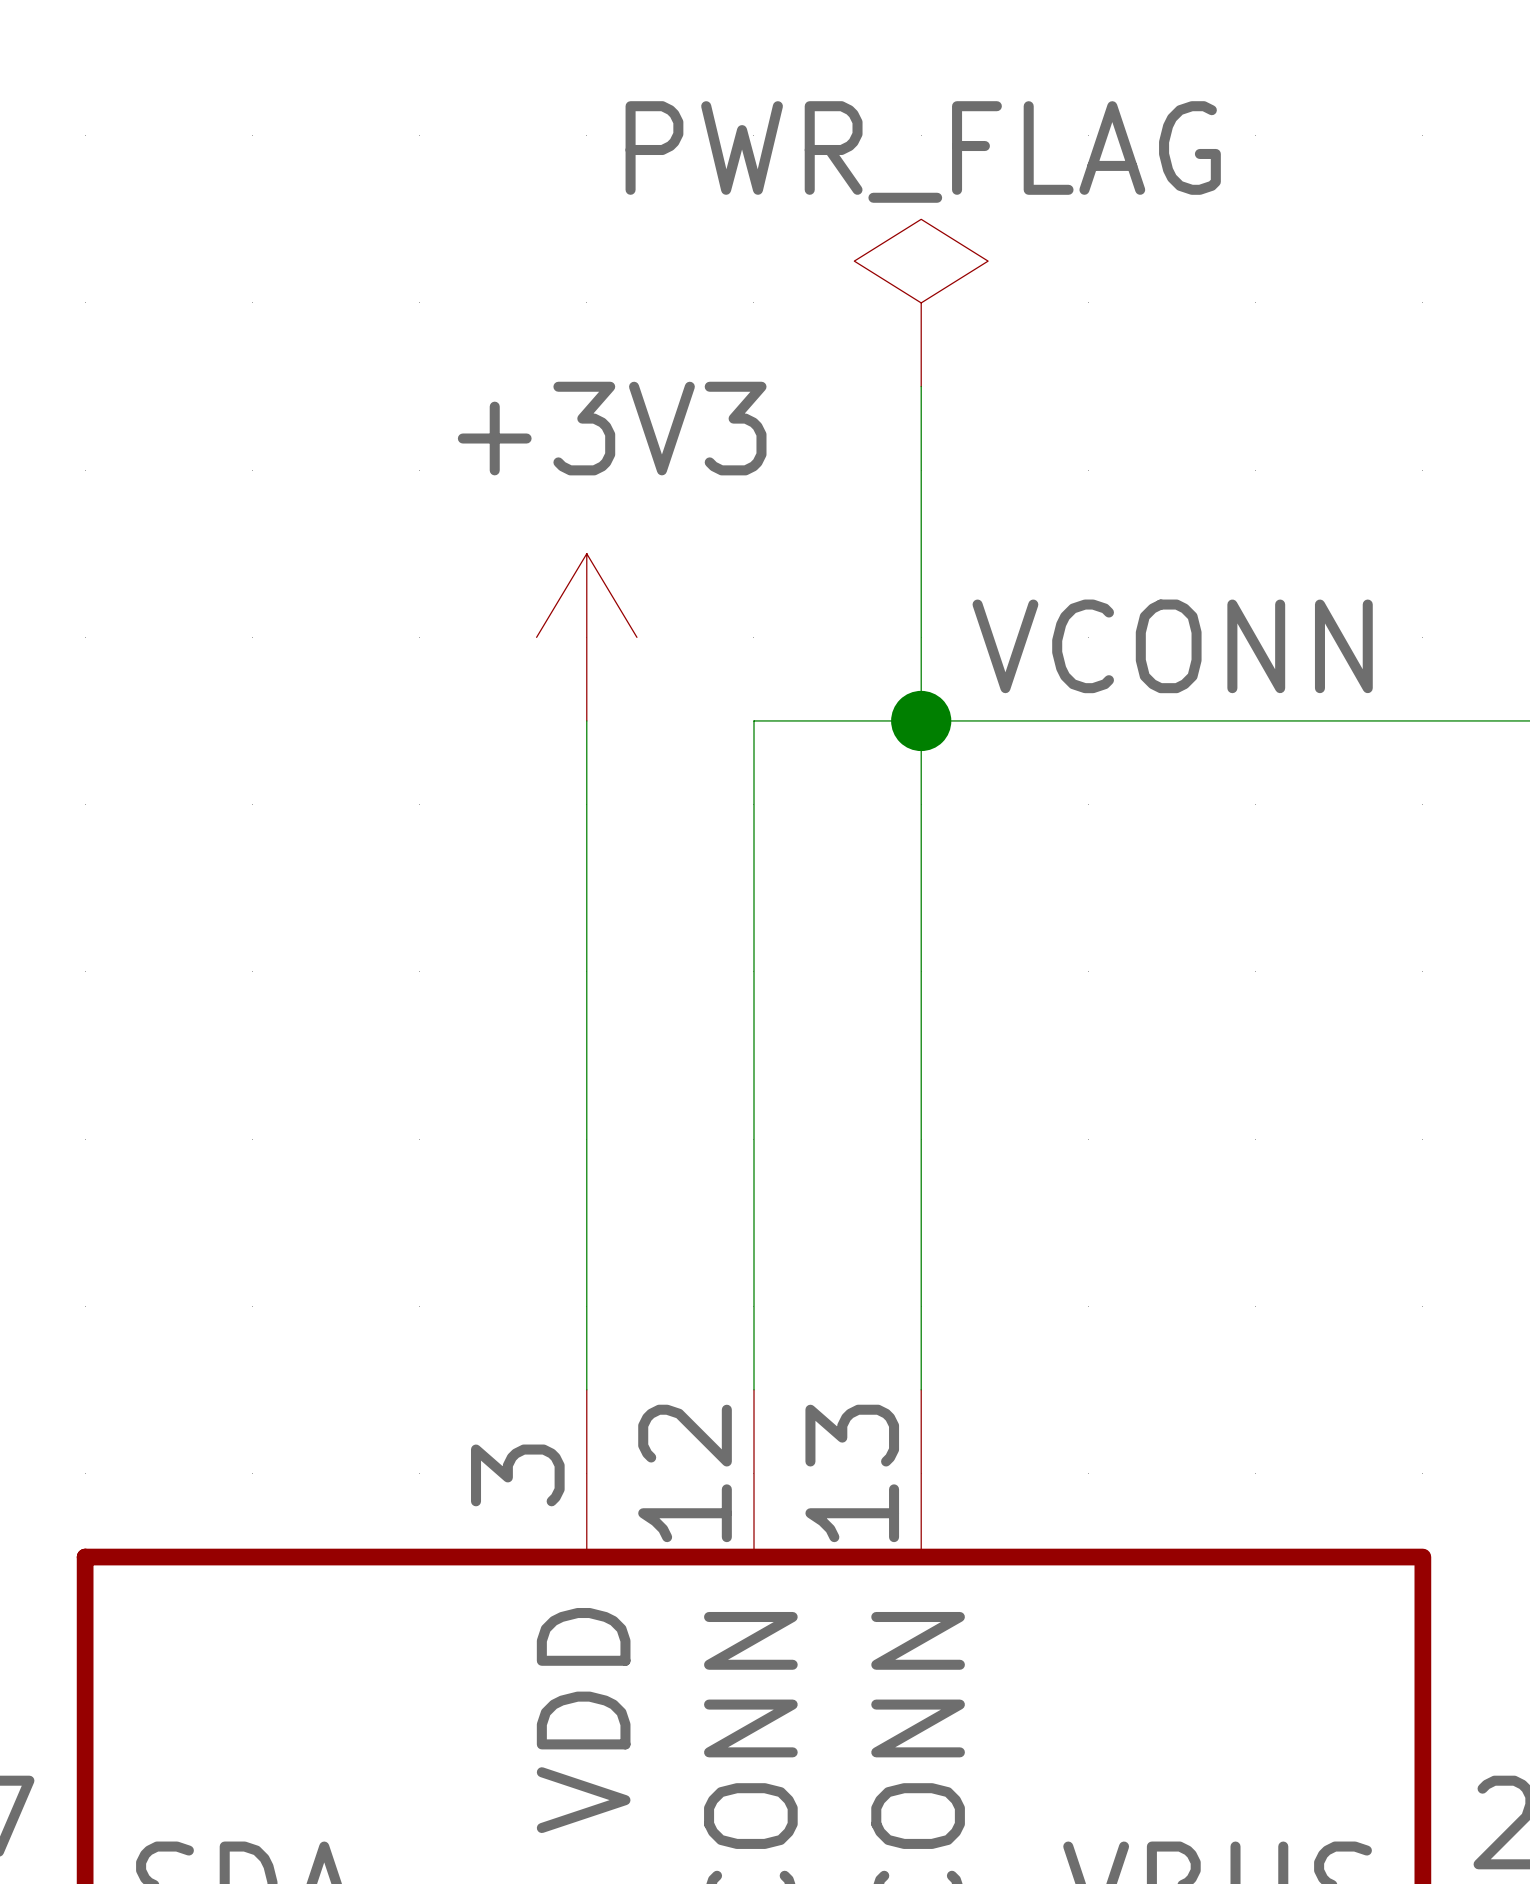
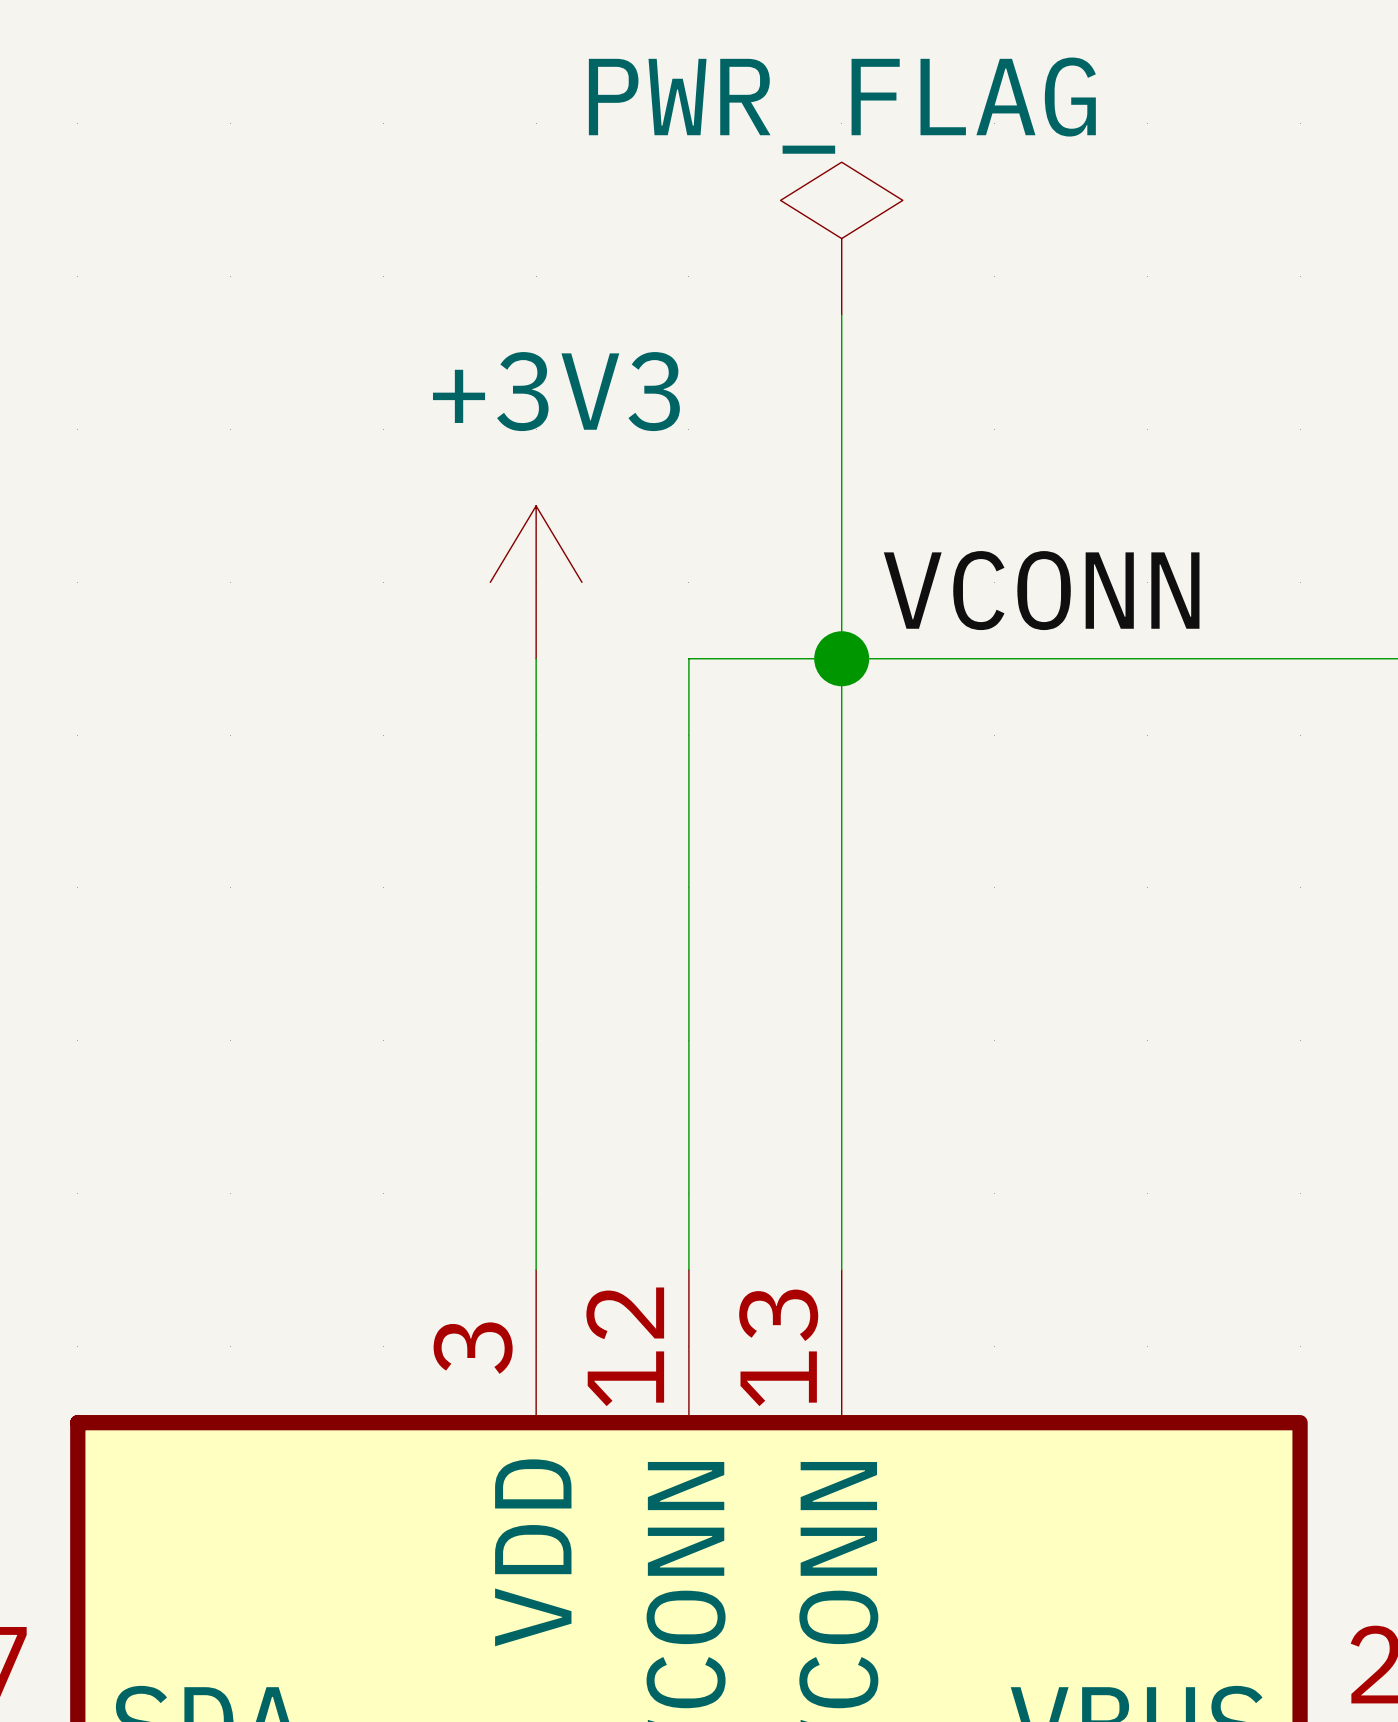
power symbol position: PWR_FLAG (921, 302) -> PWR_FLAG (841, 238)

